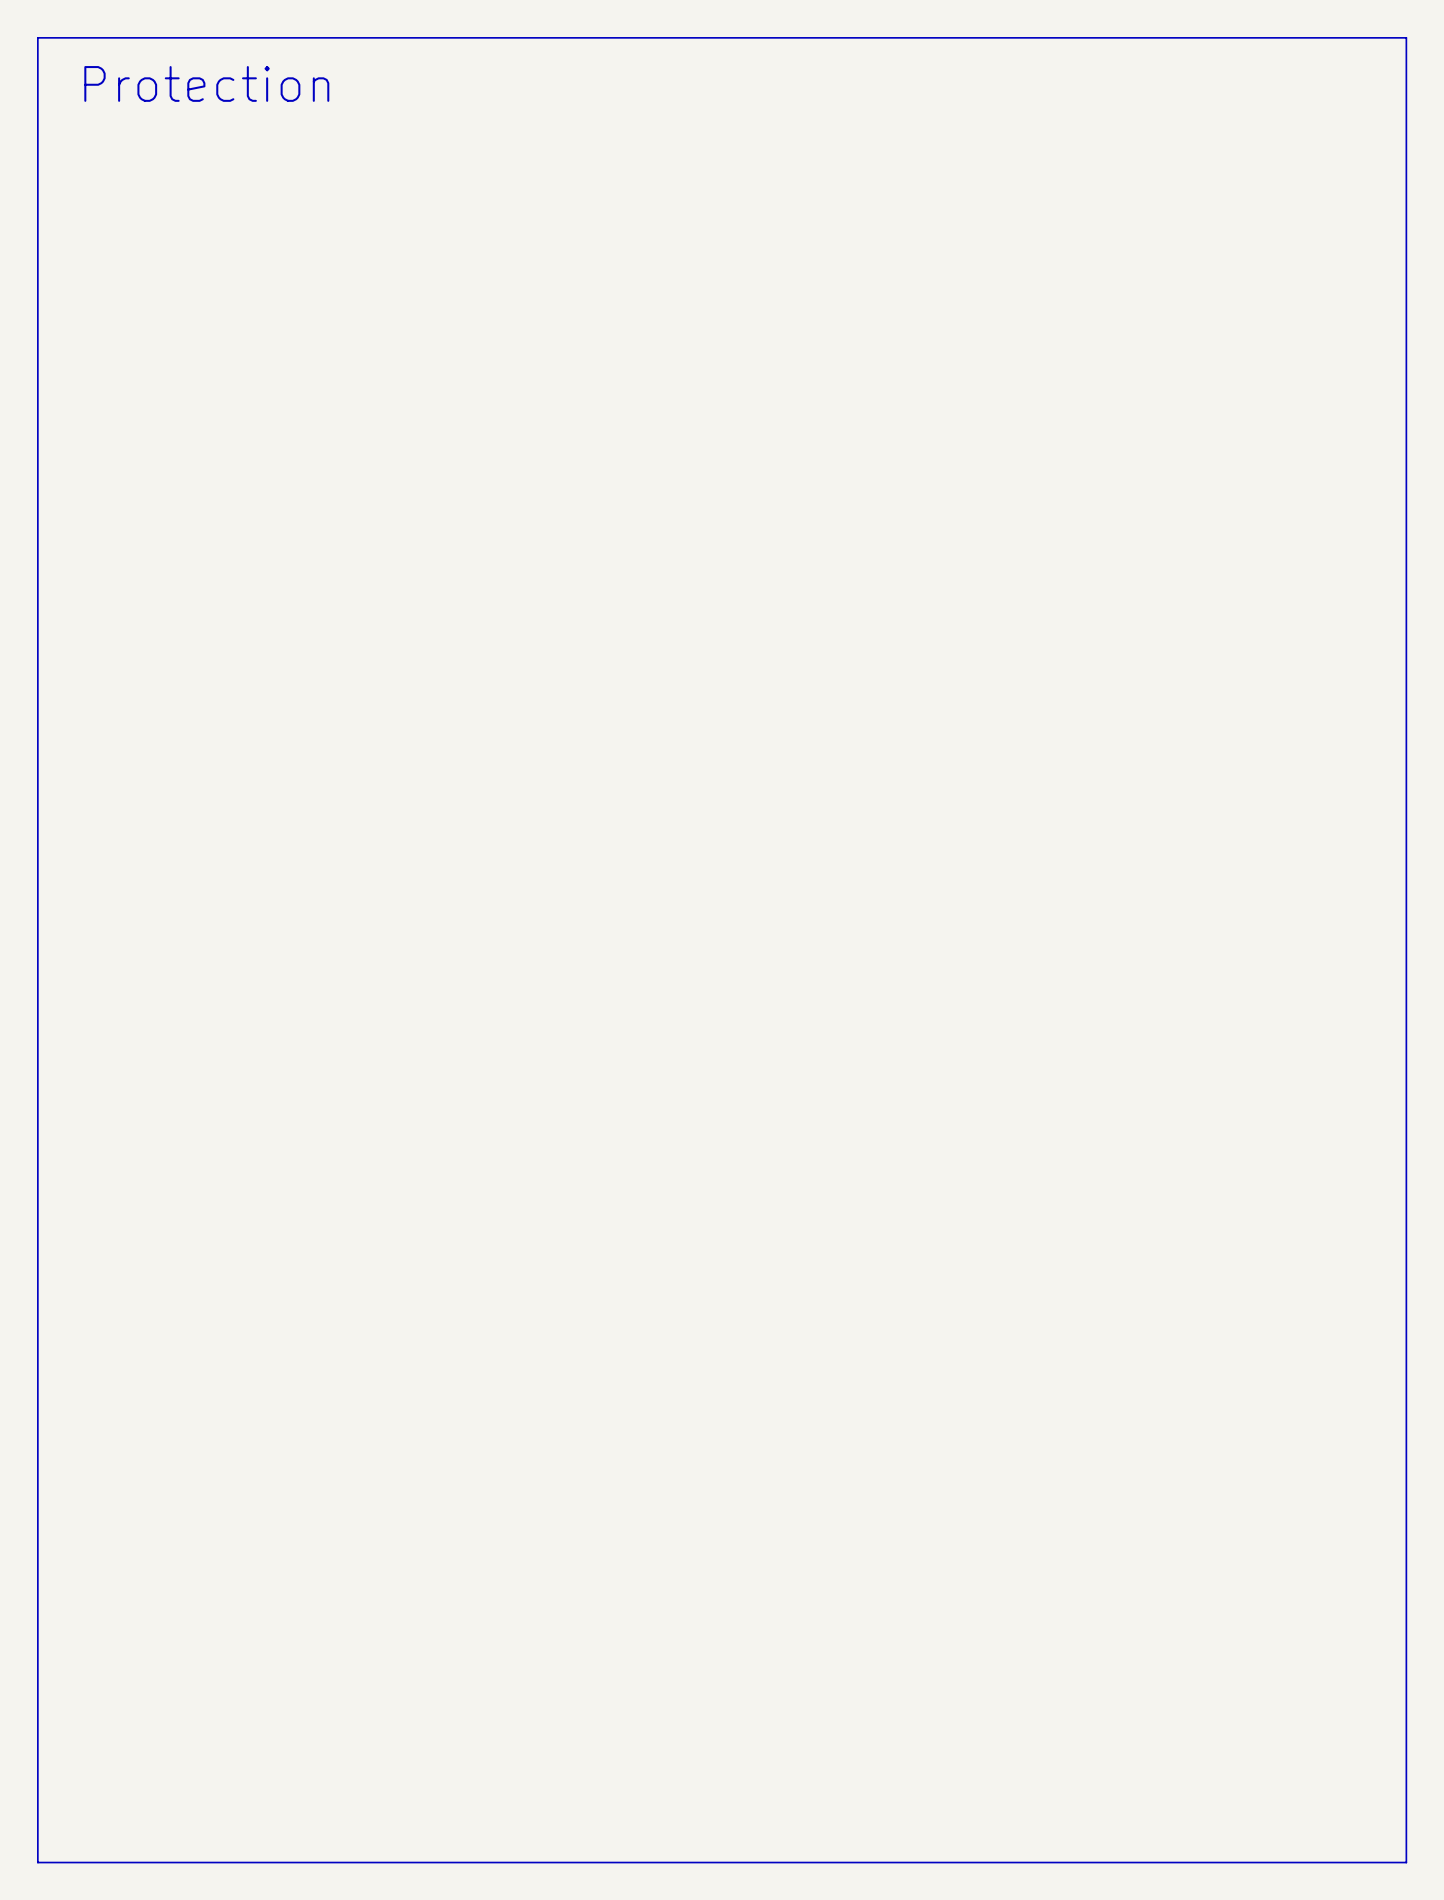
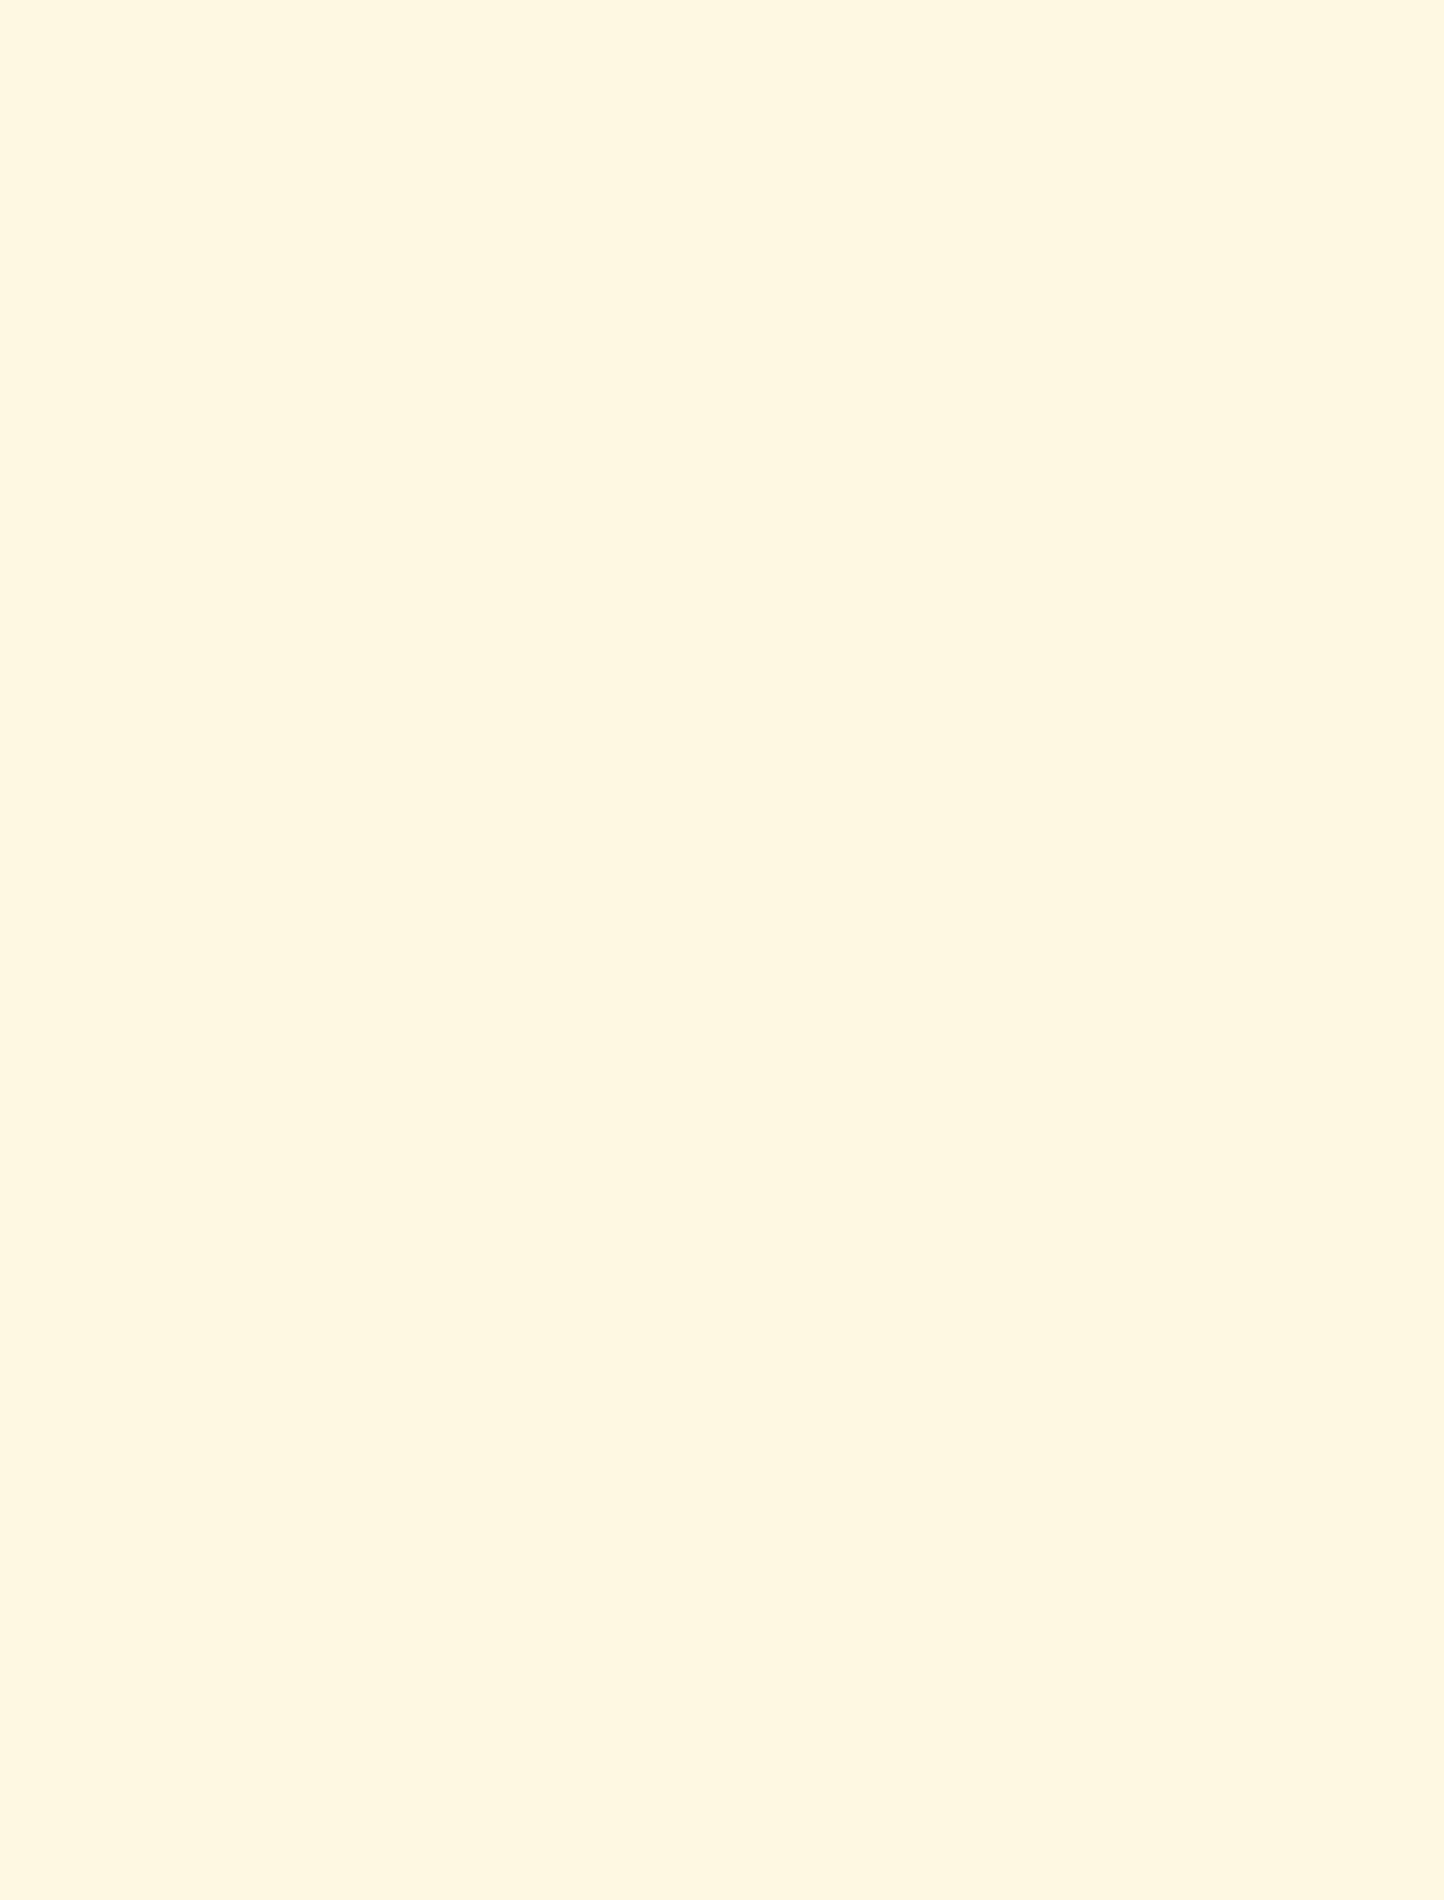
line: (37, 37) (1406, 37) (1406, 1862) (37, 1862) (37, 37) -> none
text: Protection (206, 83) -> none

